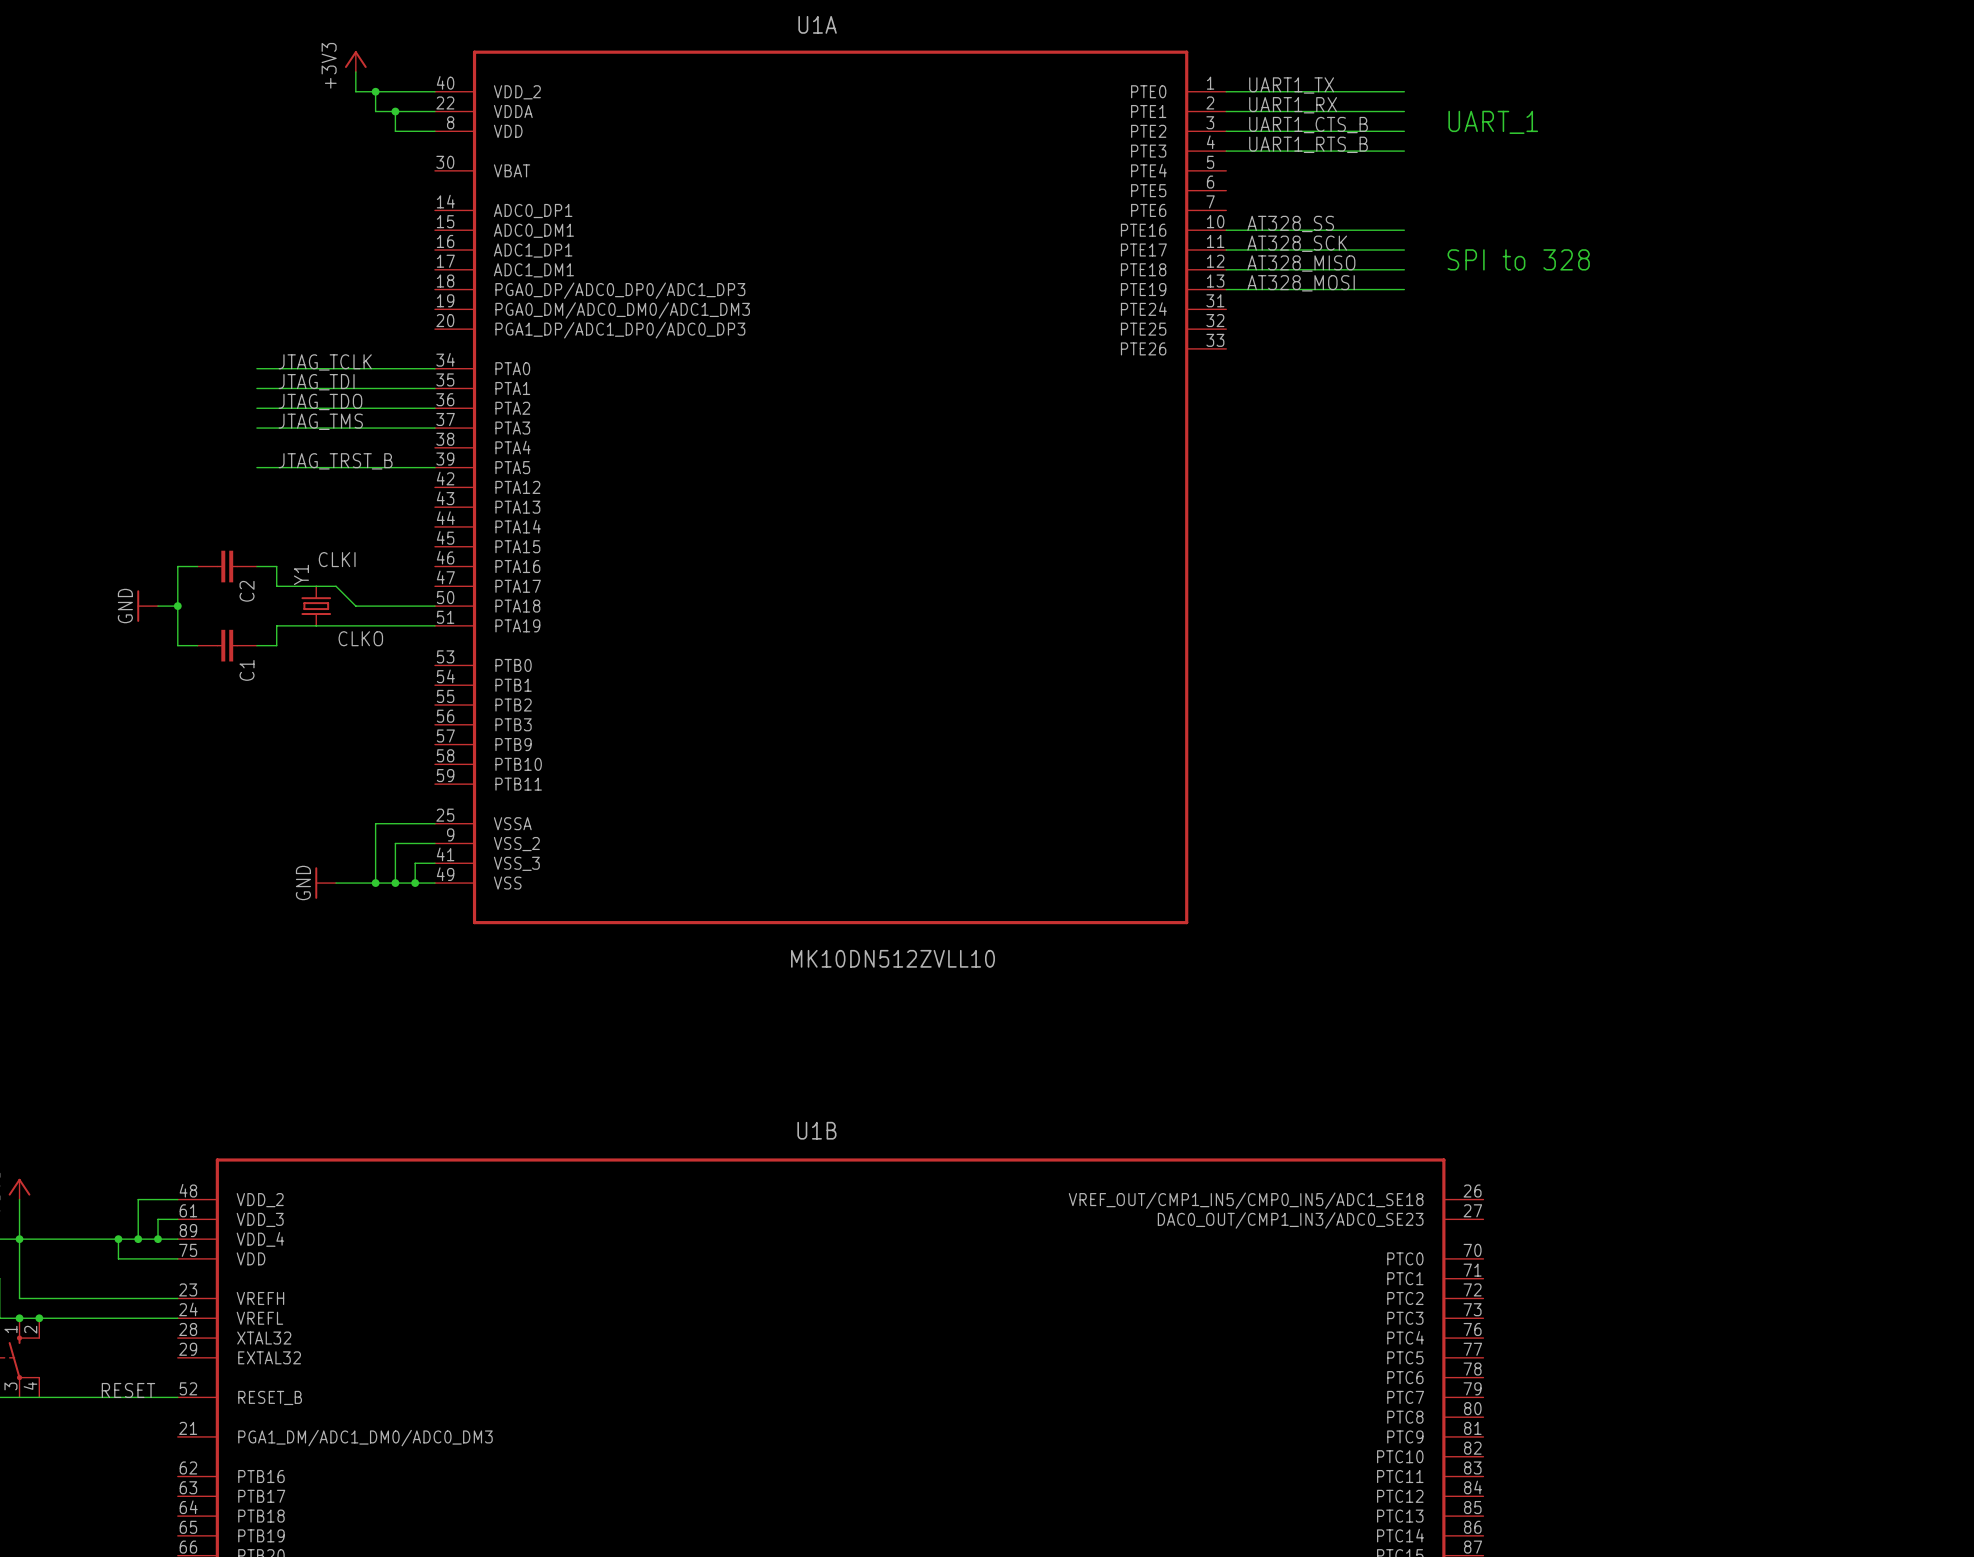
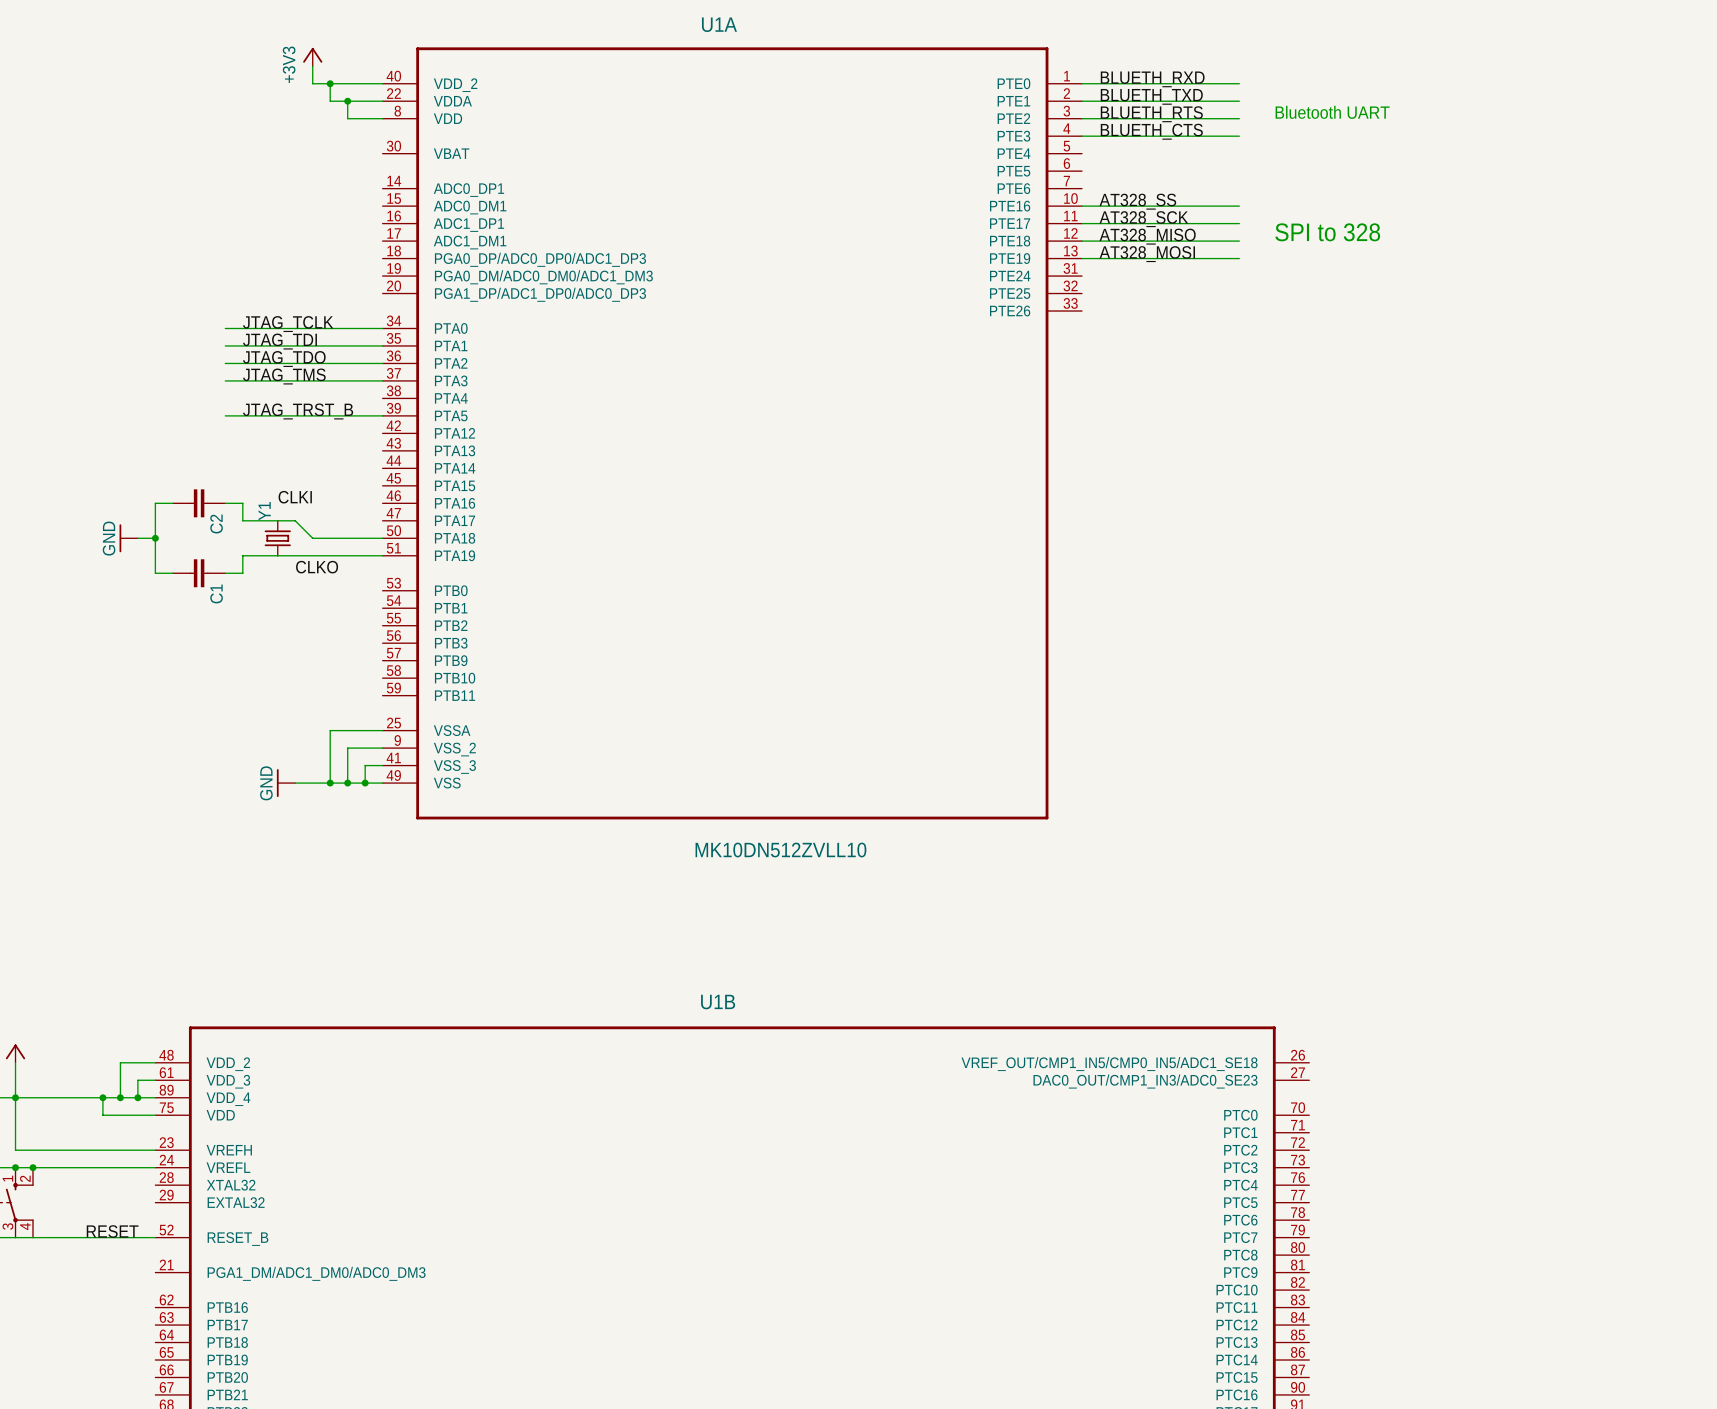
label: UART1_TX (1291, 85) -> BLUETH_RXD (1152, 79)
label: UART1_RX (1293, 105) -> BLUETH_TXD (1151, 96)
text: UART_1 (1493, 122) -> Bluetooth UART (1332, 112)
label: UART1_CTS_B (1308, 125) -> BLUETH_RTS (1151, 114)
label: UART1_RTS_B (1308, 144) -> BLUETH_CTS (1151, 131)

